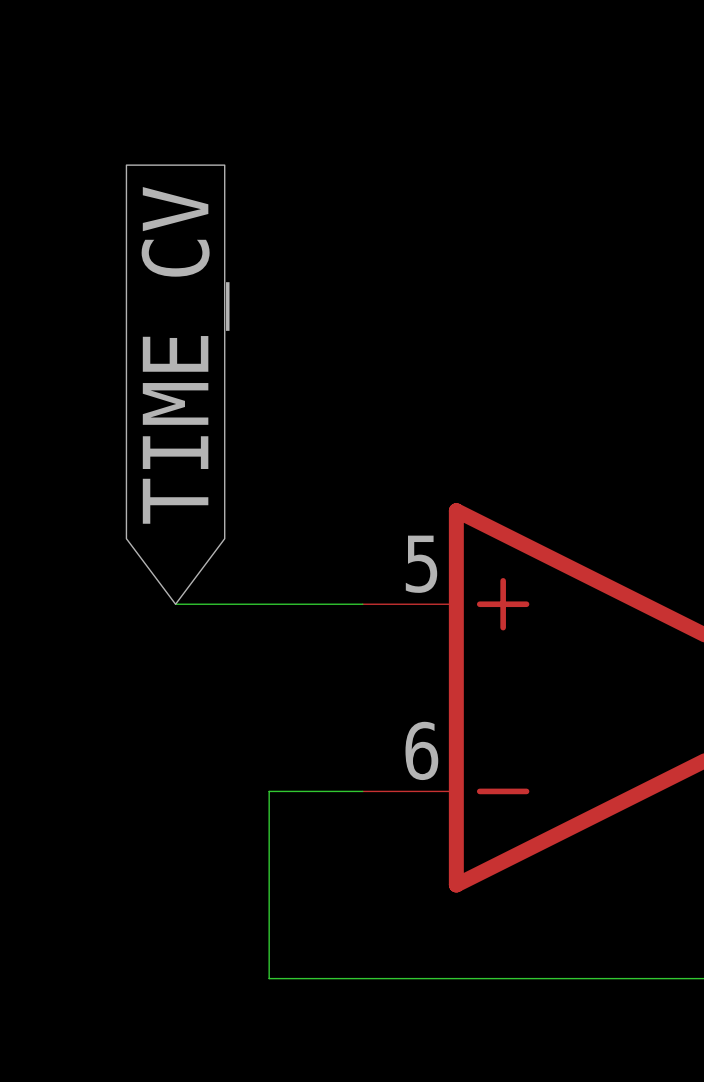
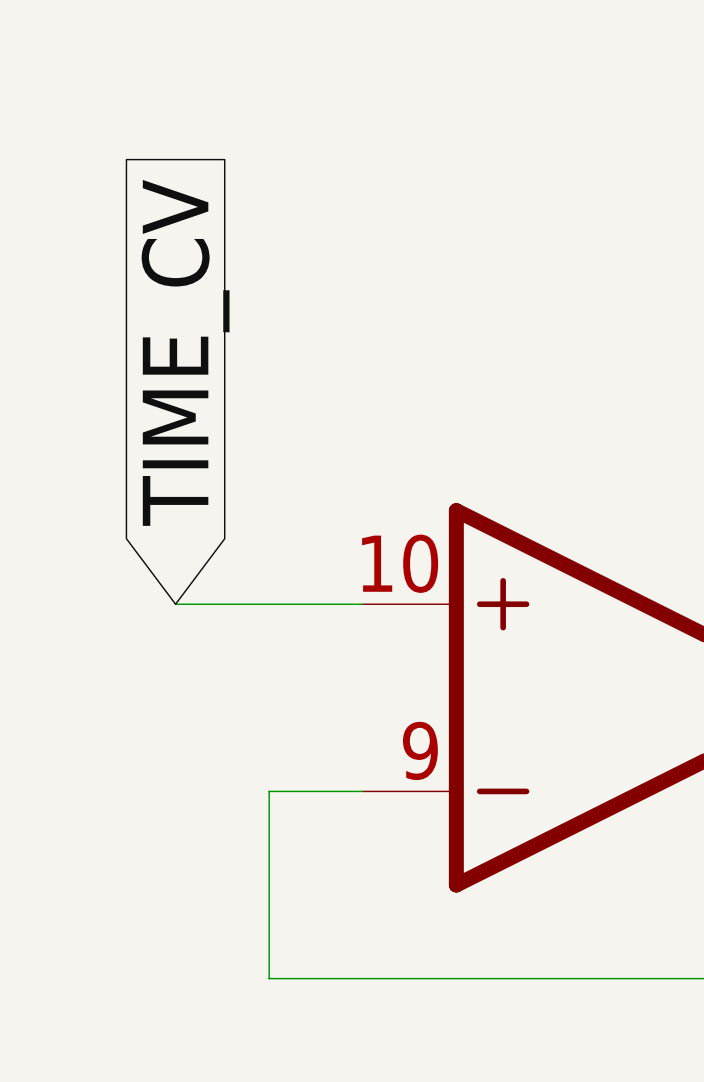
part pin number: 5 (421, 564) -> 10 (400, 563)
part pin number: 6 (421, 750) -> 9 (420, 750)

